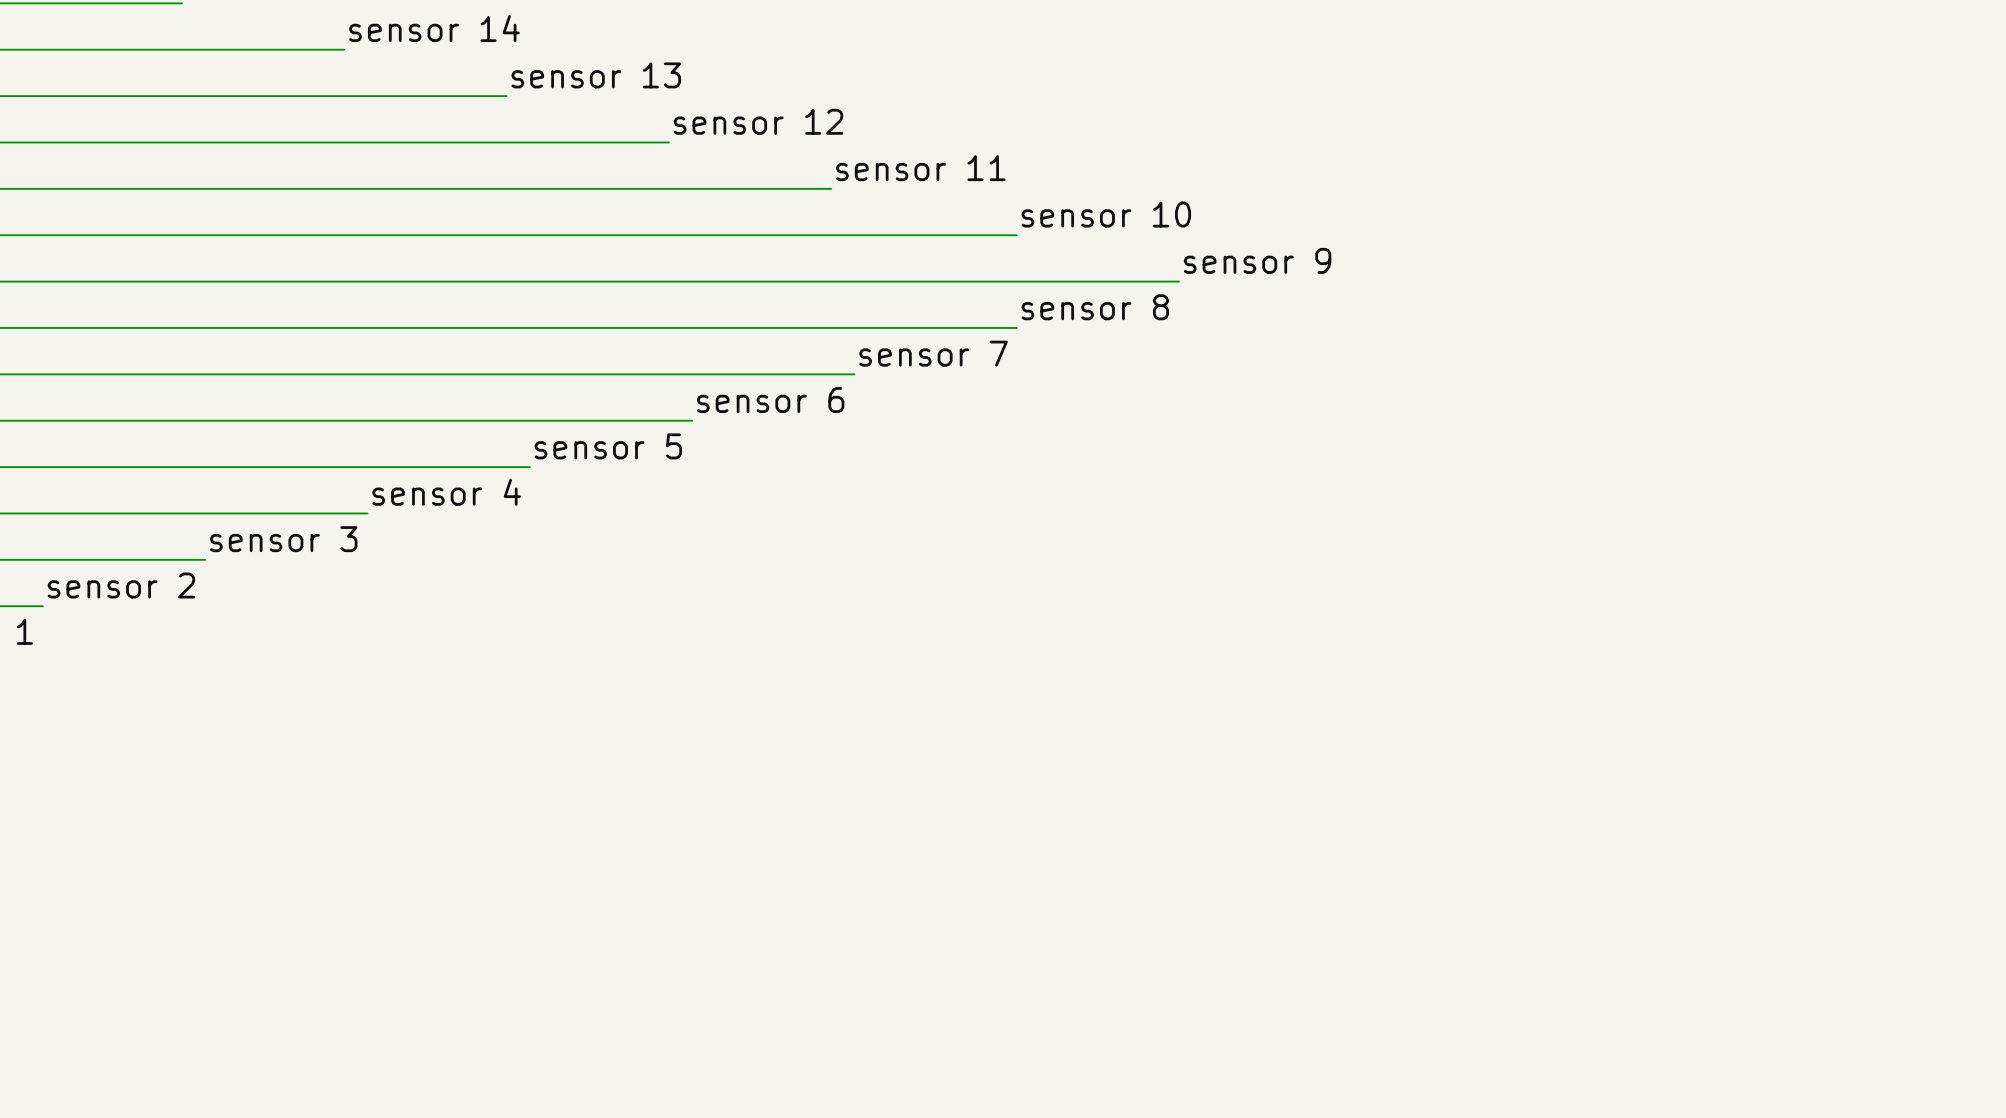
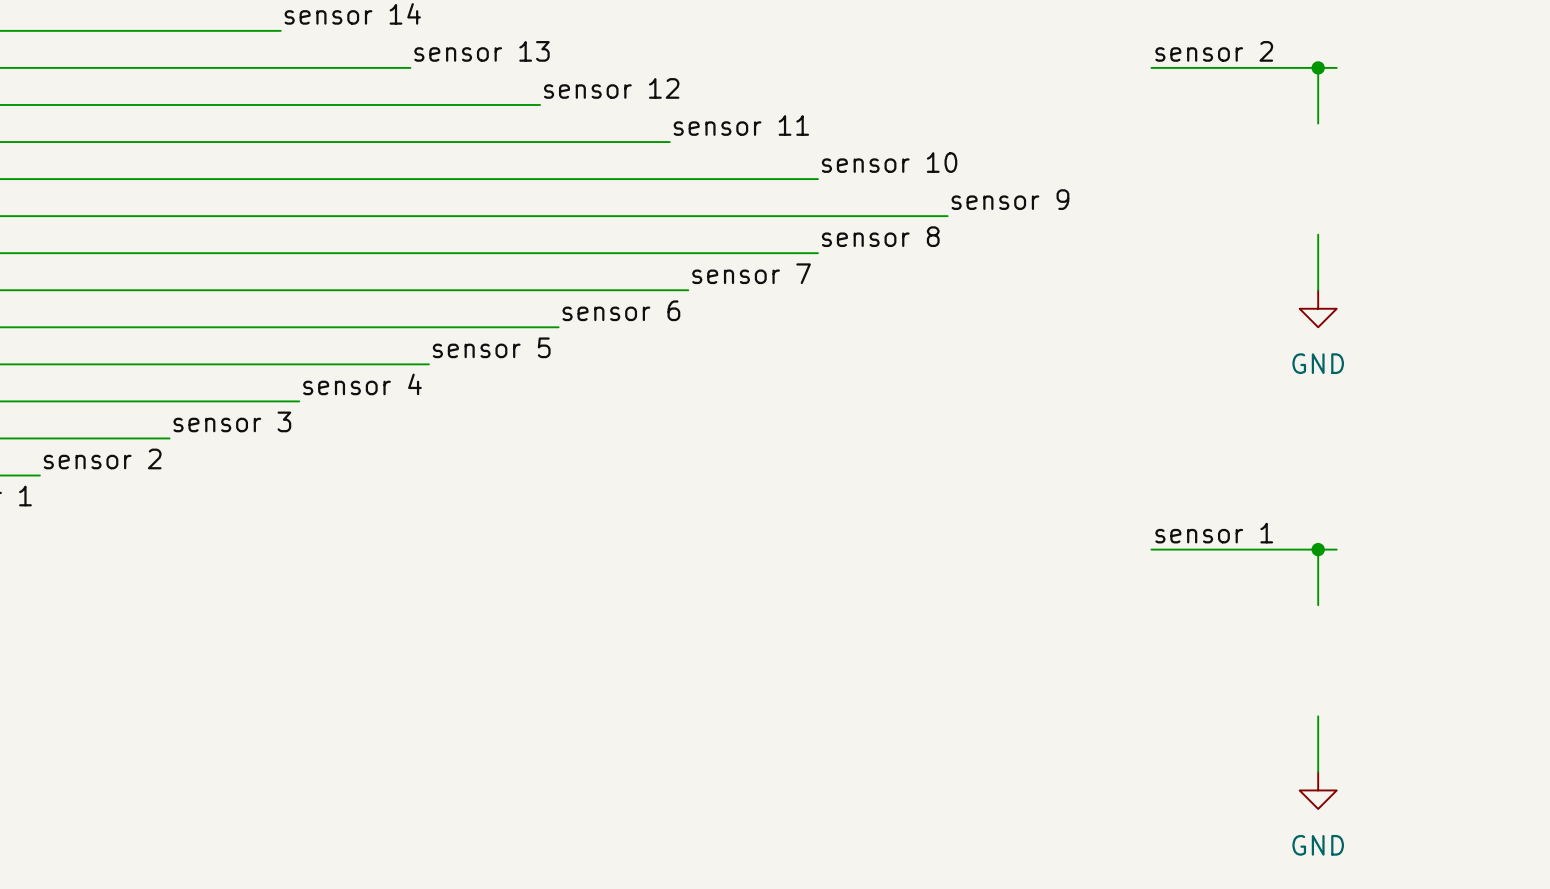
label: none -> sensor 2 (1214, 51)
wire: none -> (1151, 67) (1336, 67)
wire: none -> (1318, 67) (1318, 123)
junction: none -> (1318, 67)
wire: none -> (1318, 234) (1318, 290)
power symbol: none -> GND (1318, 308)
label: none -> sensor 1 (1214, 533)
wire: none -> (1151, 549) (1336, 549)
wire: none -> (1318, 549) (1318, 605)
junction: none -> (1318, 549)
wire: none -> (1318, 716) (1318, 771)
power symbol: none -> GND (1318, 790)

